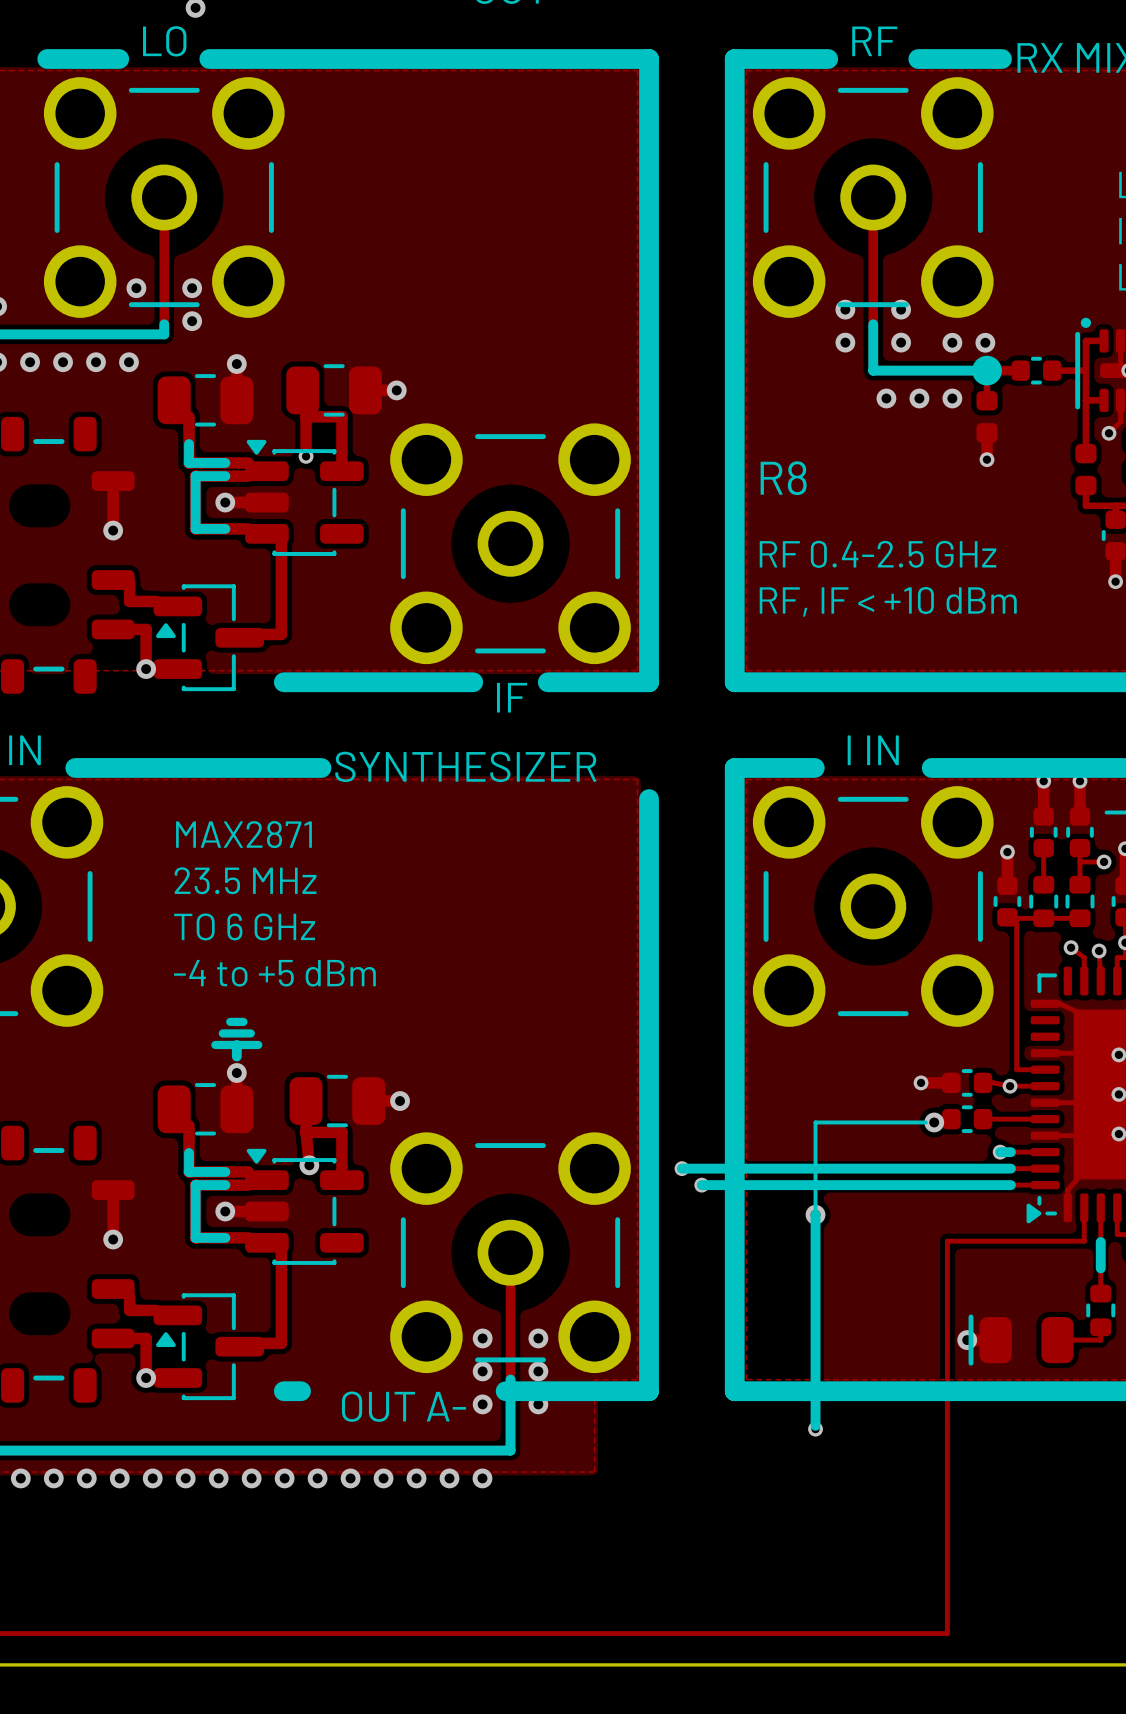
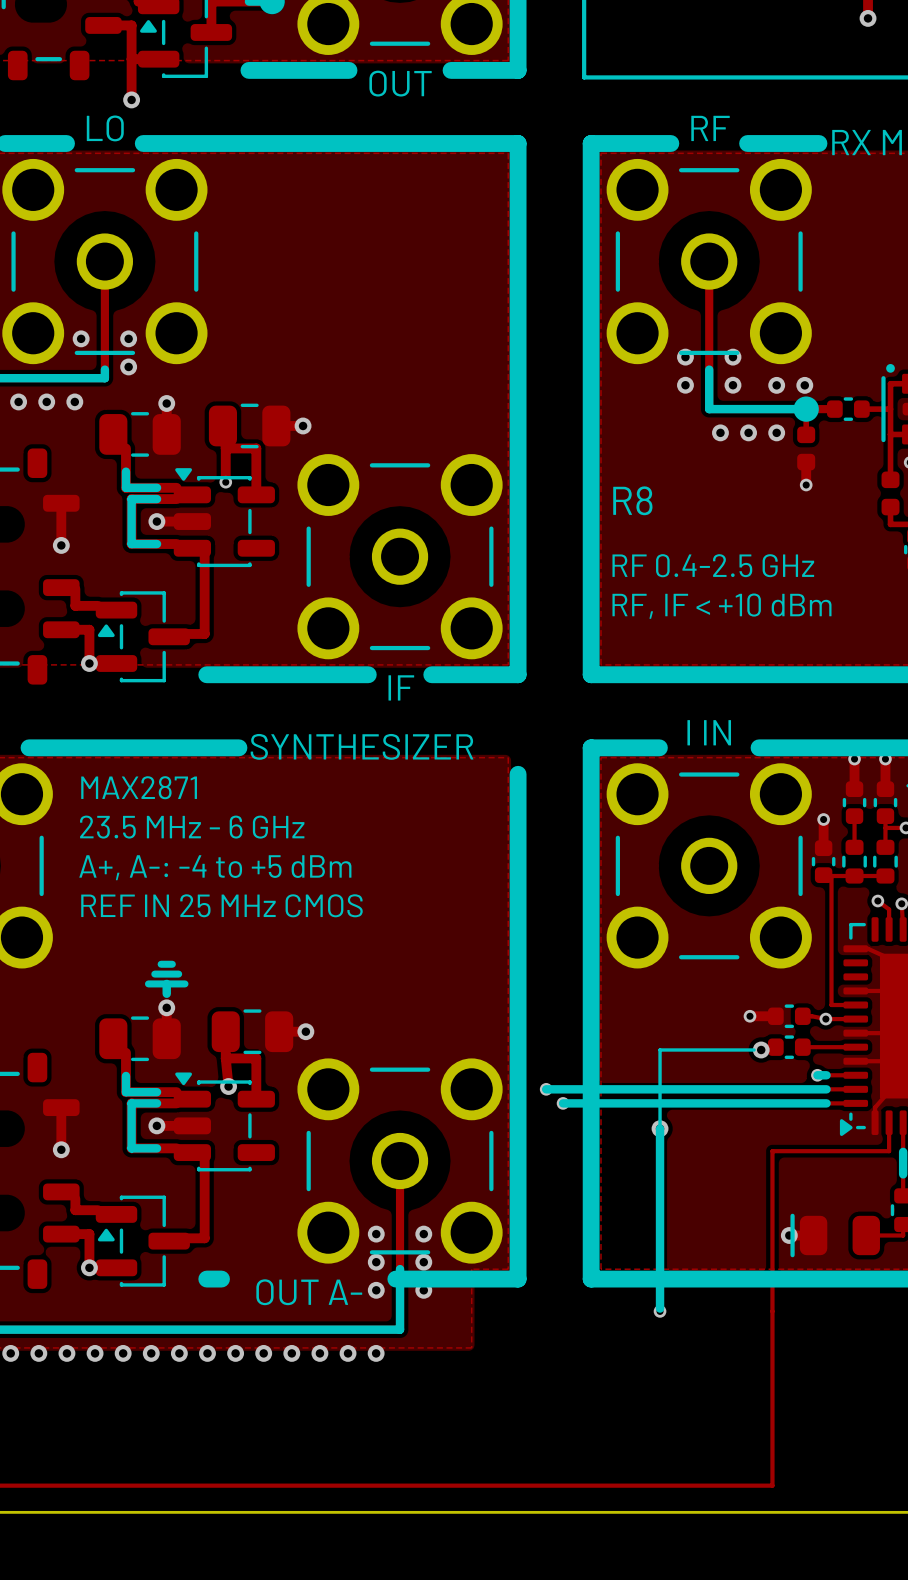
text position: MAX2871 (243, 834) -> MAX2871 (139, 787)
text: 23.5 MHz (245, 880) -> 23.5 MHz - 6 GHz (192, 827)
text: none -> A+, A-: -4 to +5 dBm (215, 867)
text: TO 6 GHz (244, 926) -> none
text: none -> REF IN 25 MHz CMOS (221, 905)
text: -4 to +5 dBm (274, 973) -> none

